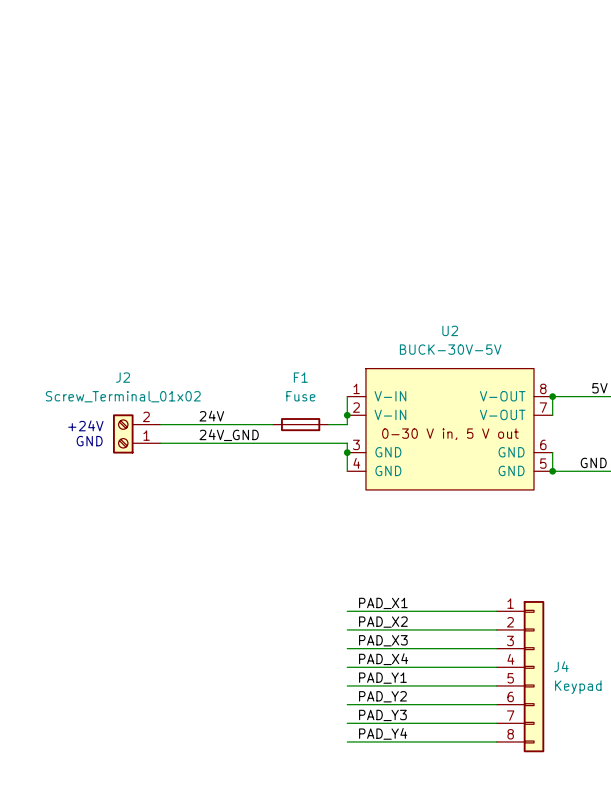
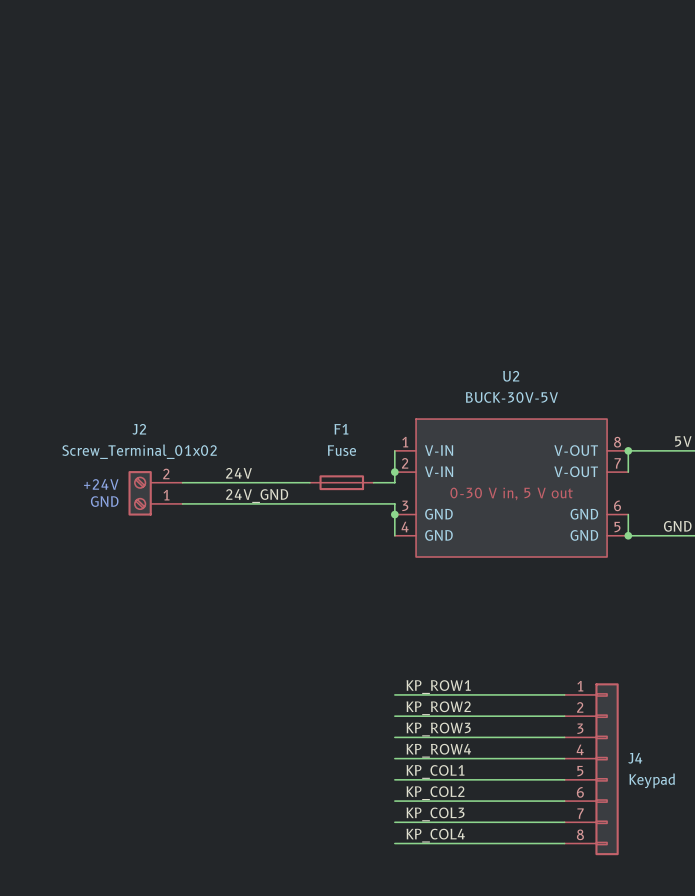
label: PAD_X1 (383, 603) -> KP_ROW1 (438, 687)
label: PAD_X2 (383, 622) -> KP_ROW2 (438, 708)
label: PAD_X3 (383, 640) -> KP_ROW3 (438, 729)
label: PAD_X4 (383, 659) -> KP_ROW4 (438, 750)
label: PAD_Y1 (382, 678) -> KP_COL1 (435, 771)
label: PAD_Y2 (382, 696) -> KP_COL2 (435, 793)
label: PAD_Y3 (382, 715) -> KP_COL3 (435, 814)
label: PAD_Y4 (383, 733) -> KP_COL4 (435, 835)

